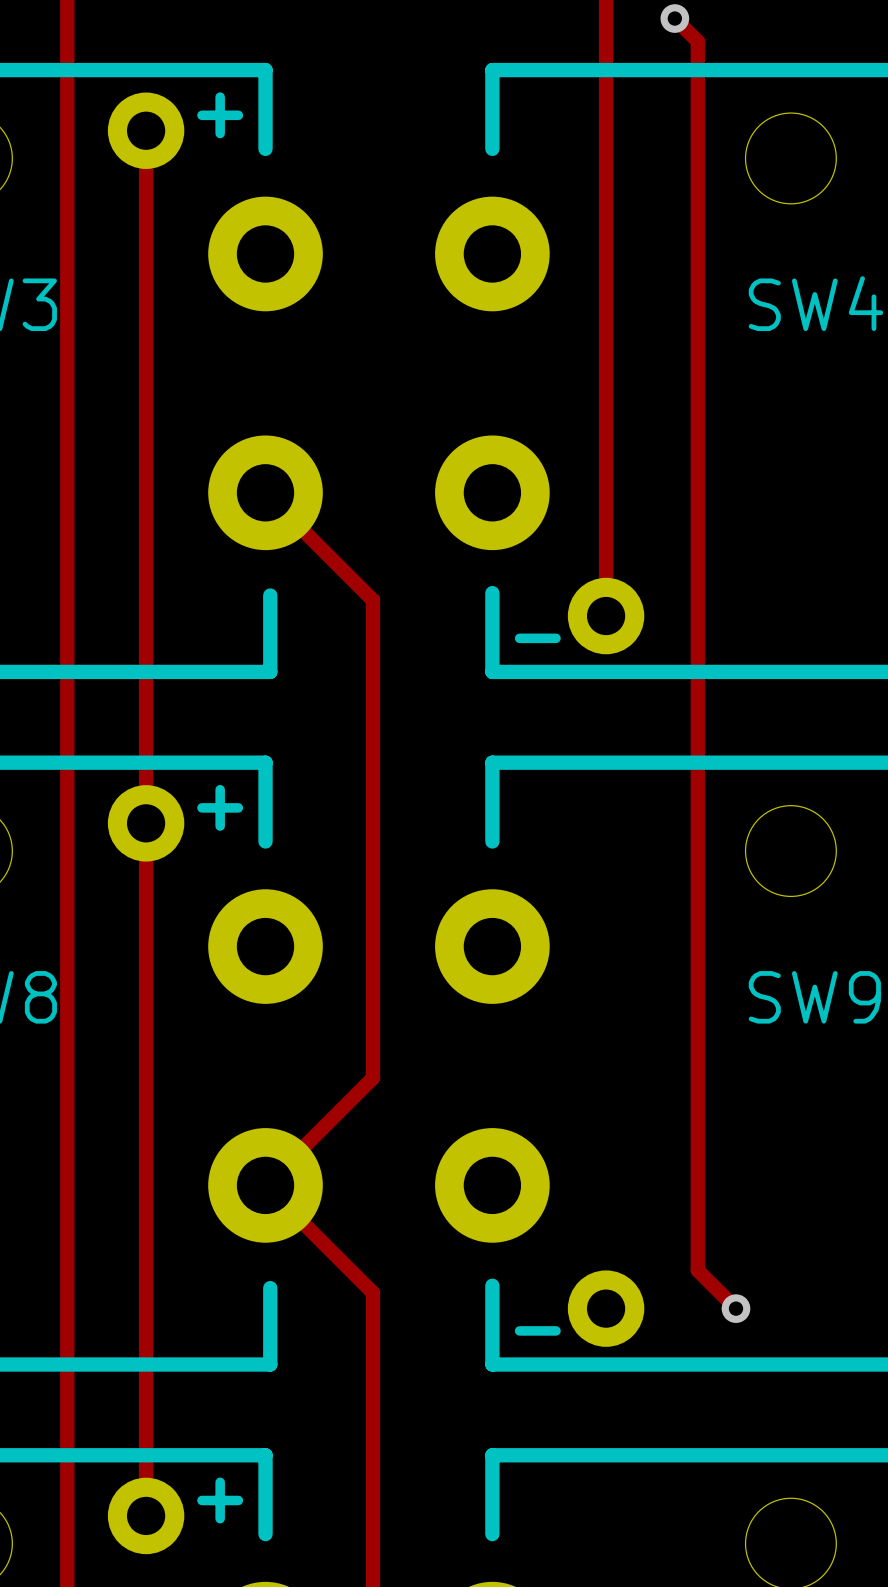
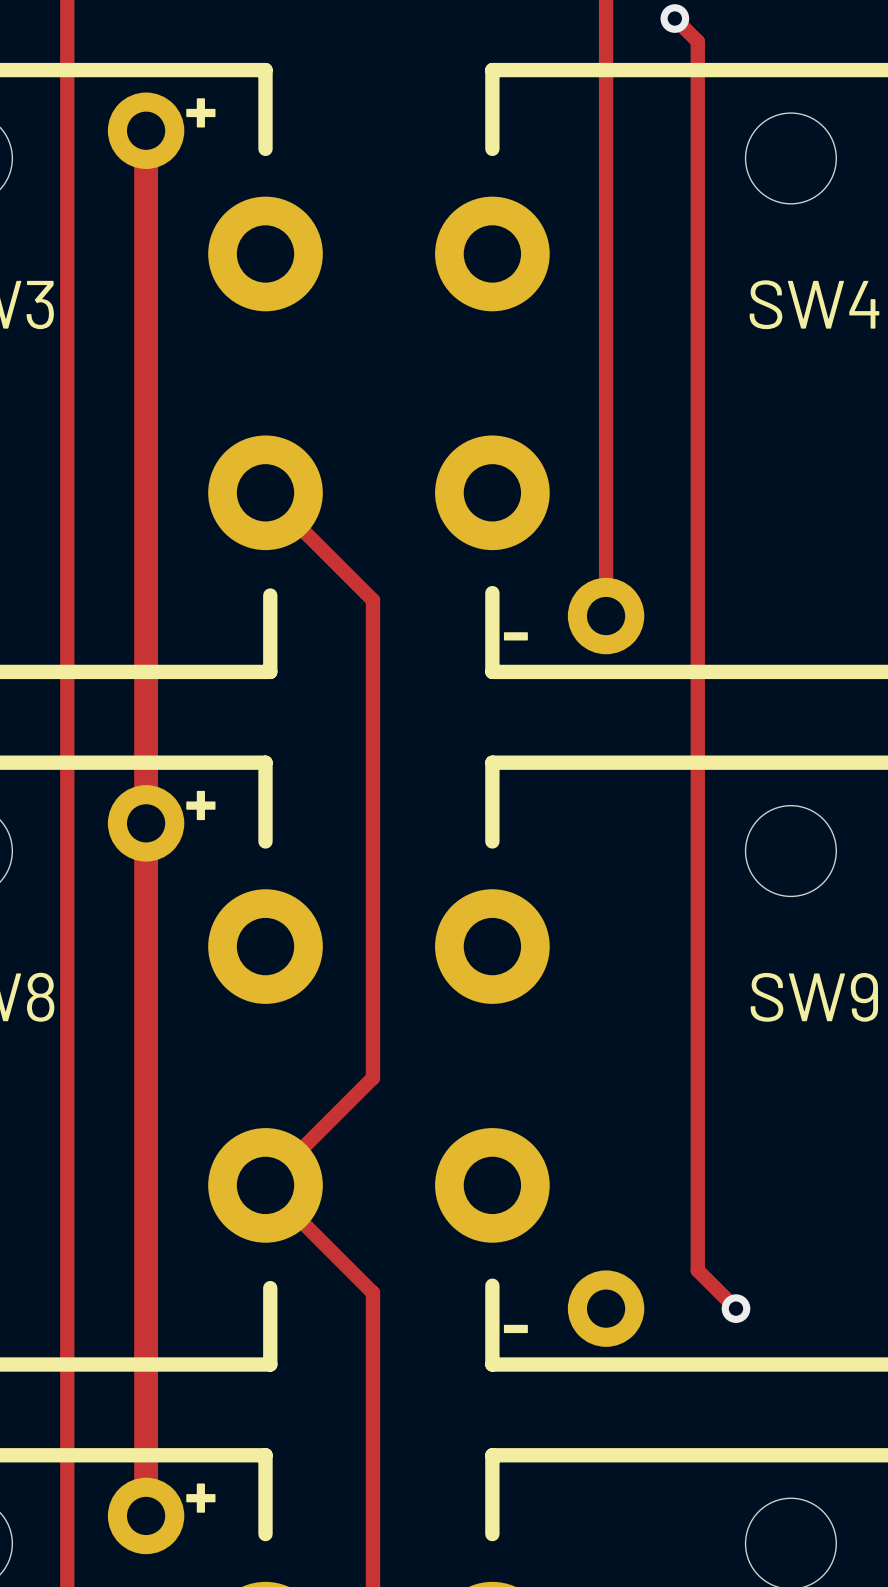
track width: thin (146, 130) (146, 1515) -> thick (146, 130) (146, 1515)

